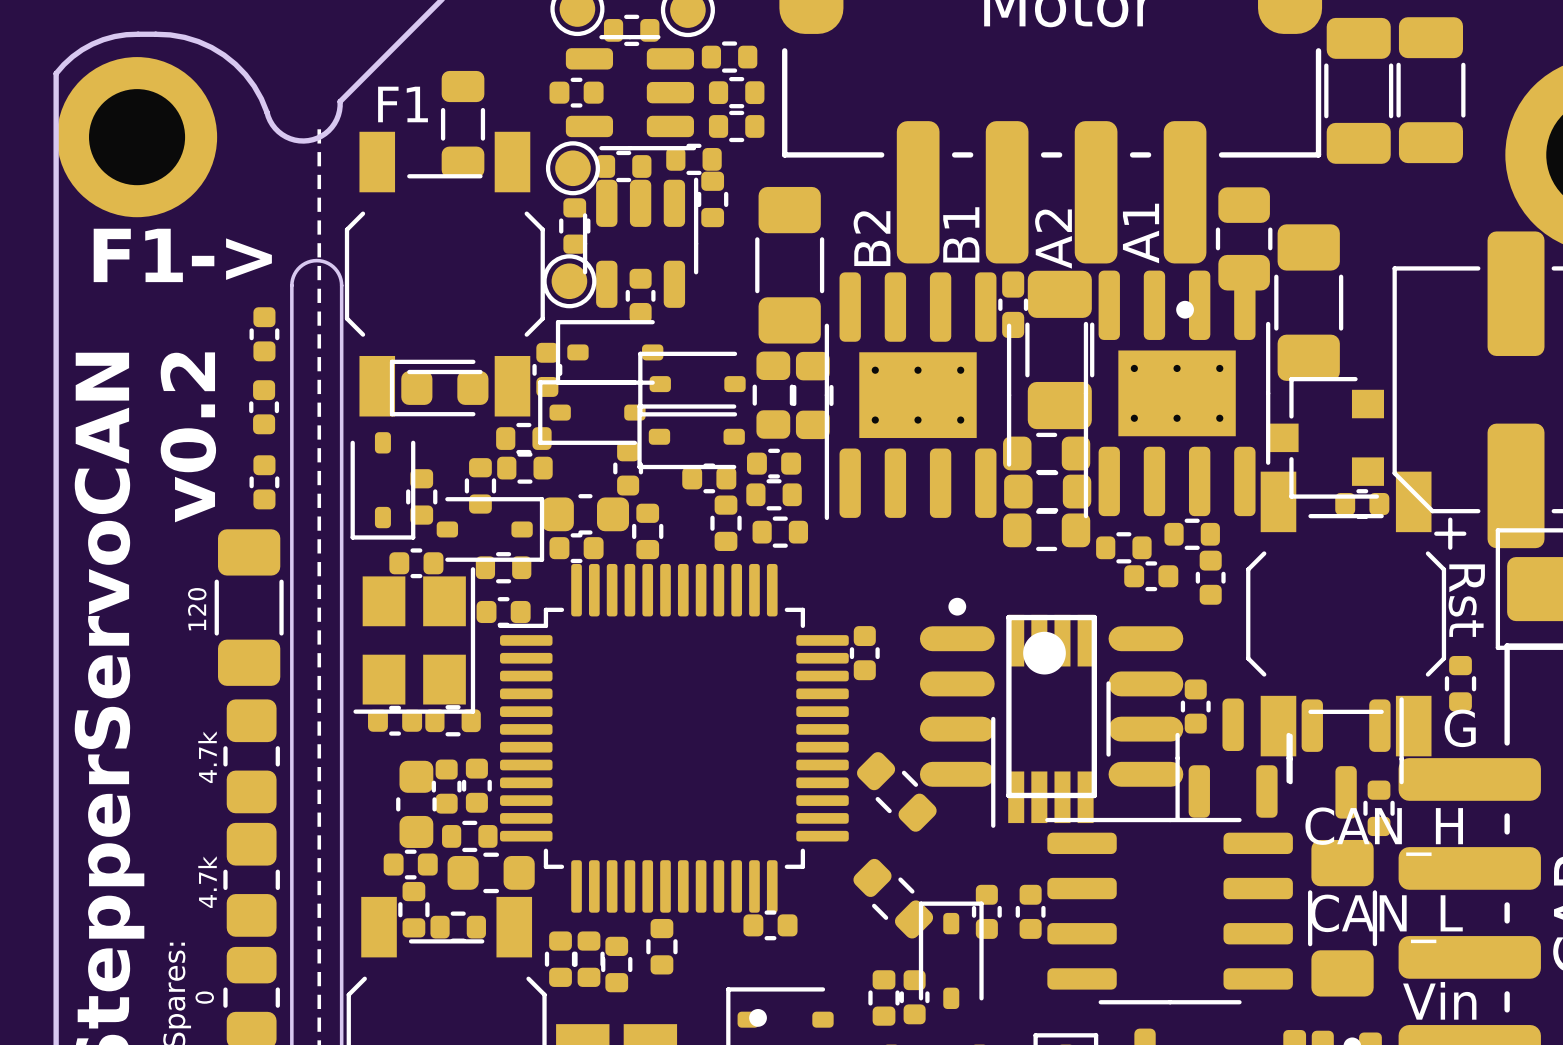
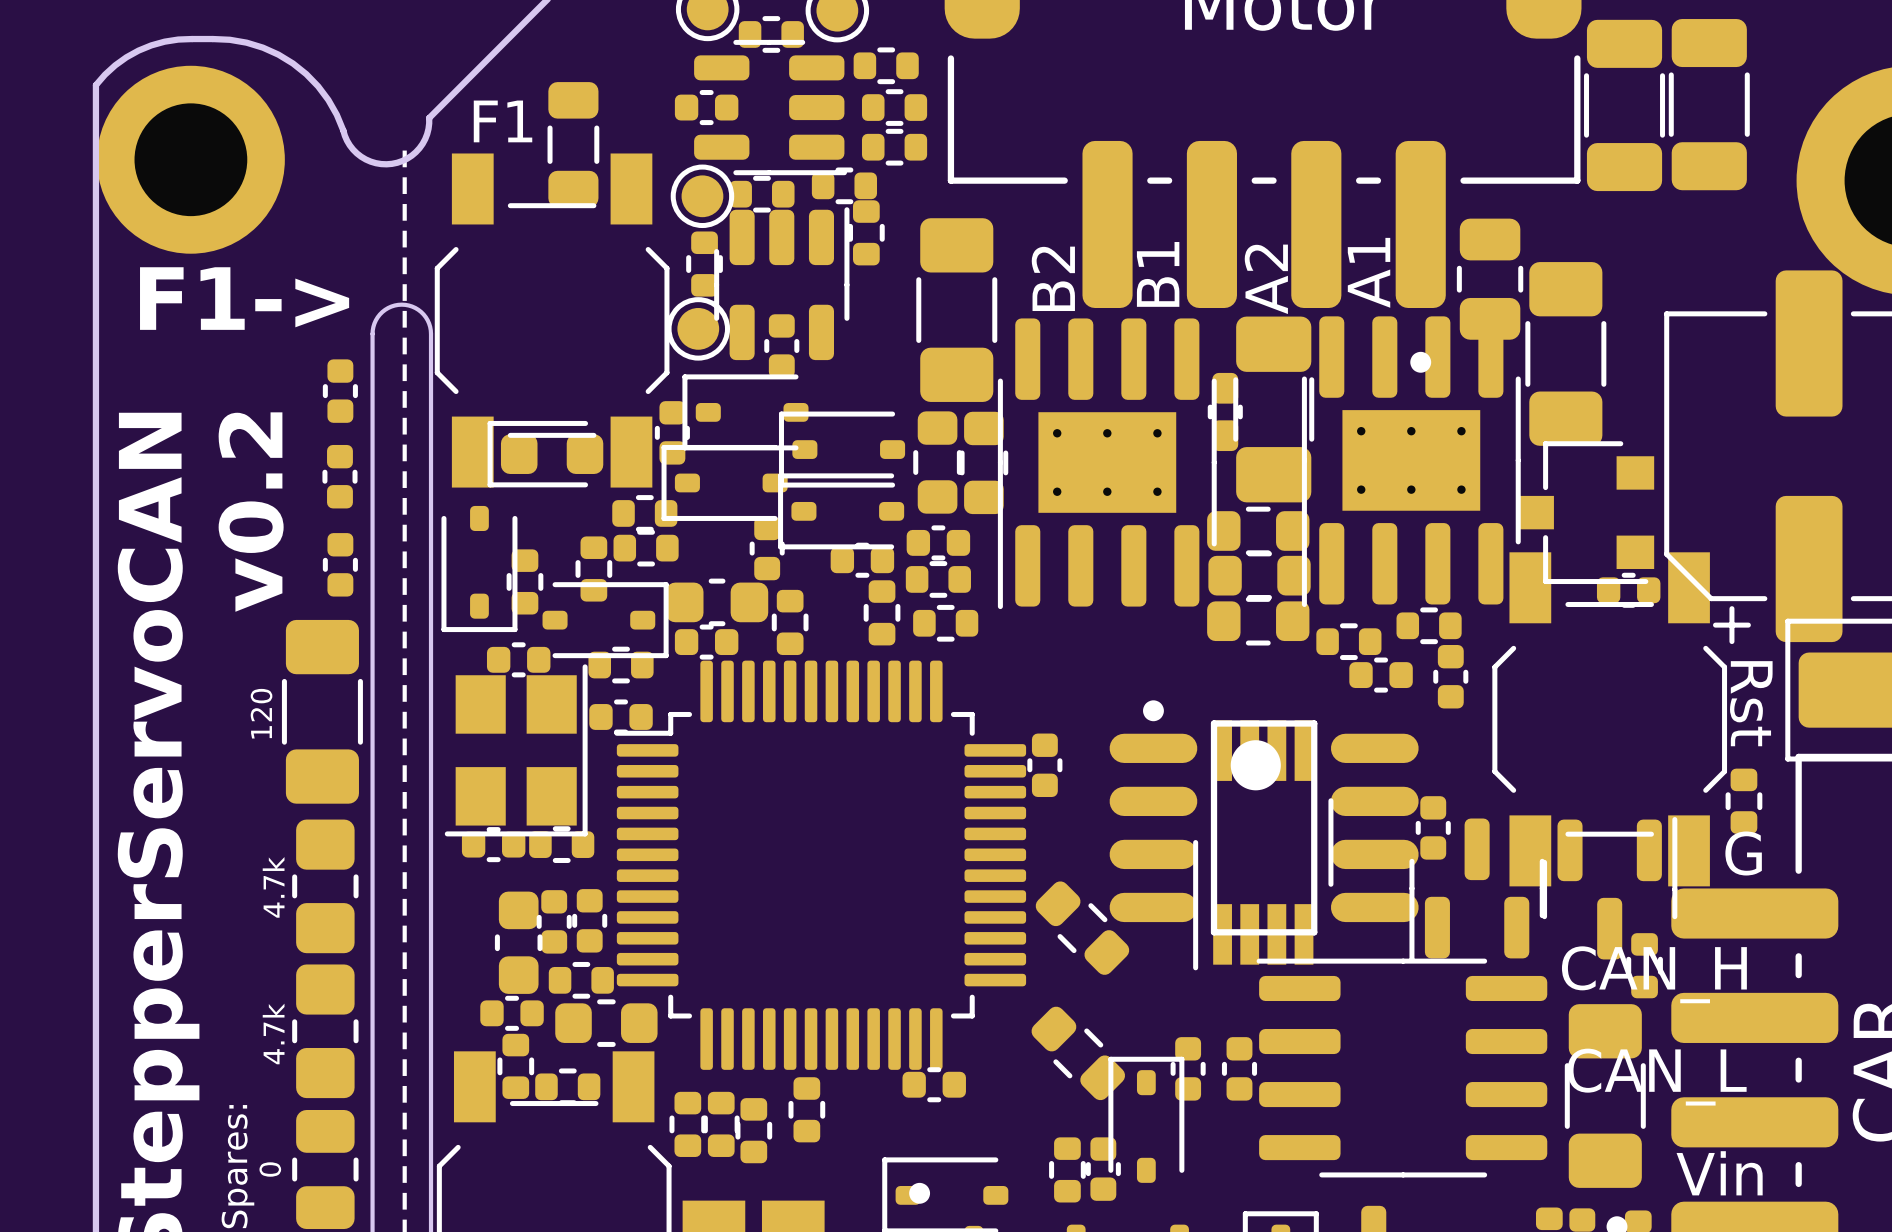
part position: (1013, 304) -> (1225, 411)
part position: (1379, 808) -> (1644, 965)
part position: (1342, 918) -> (1605, 1096)

